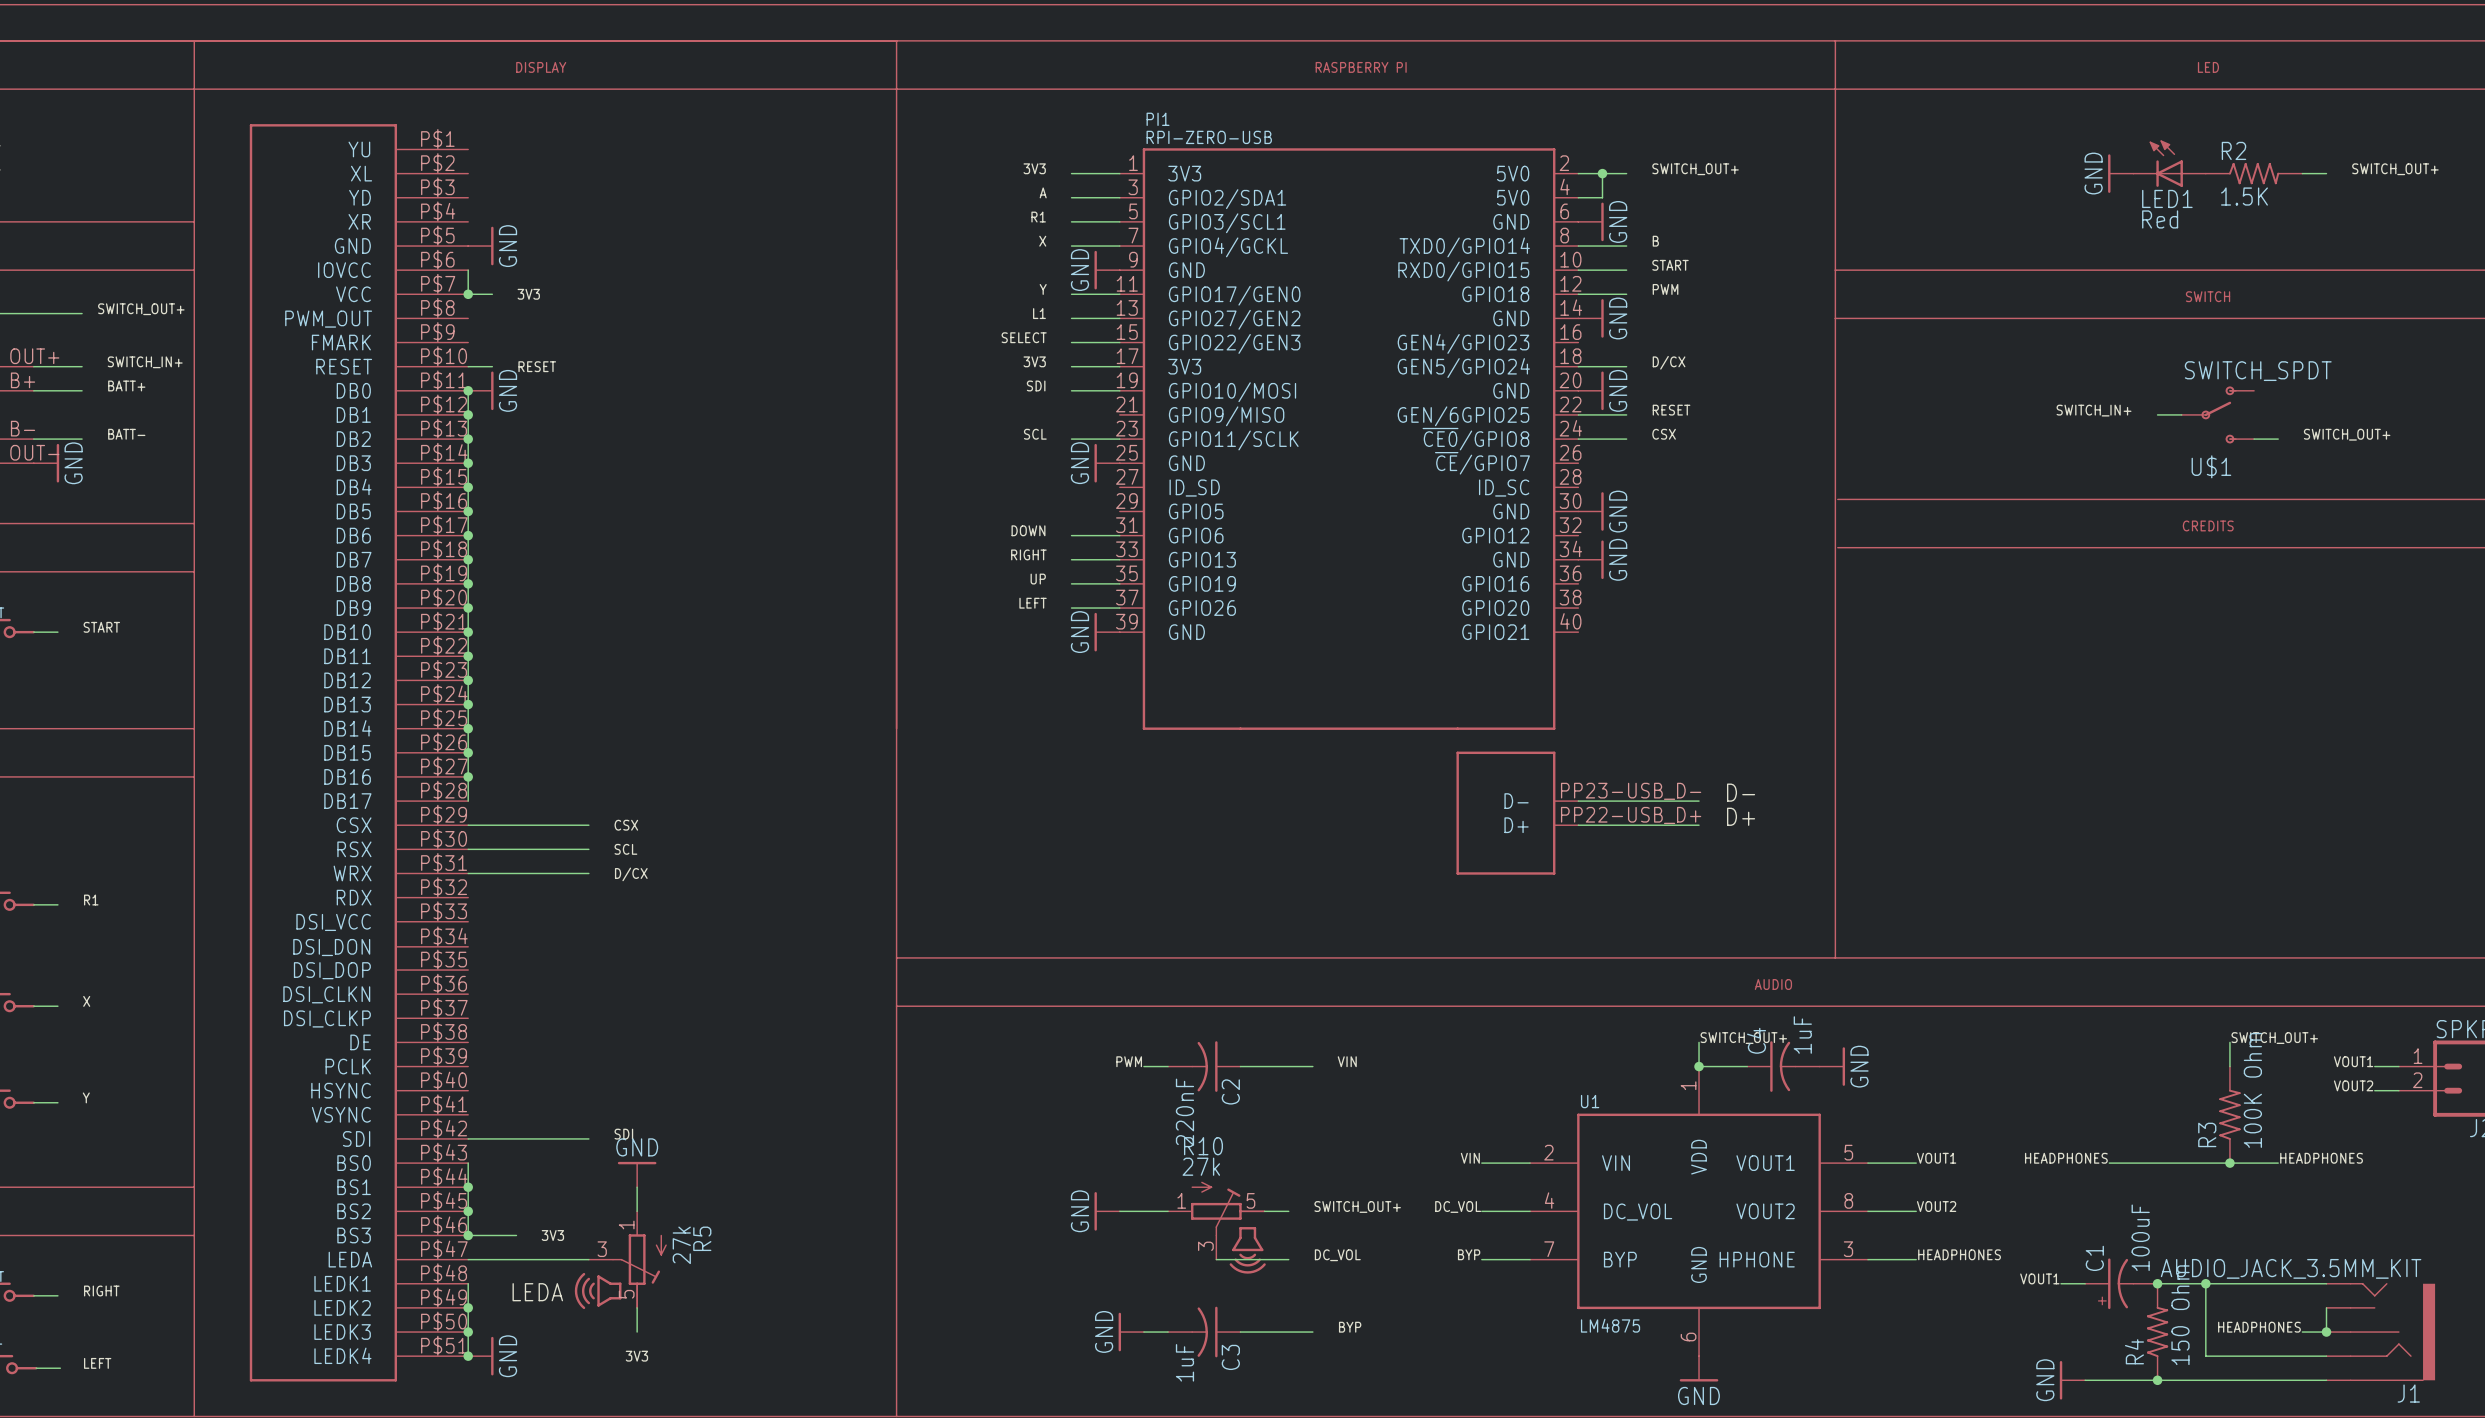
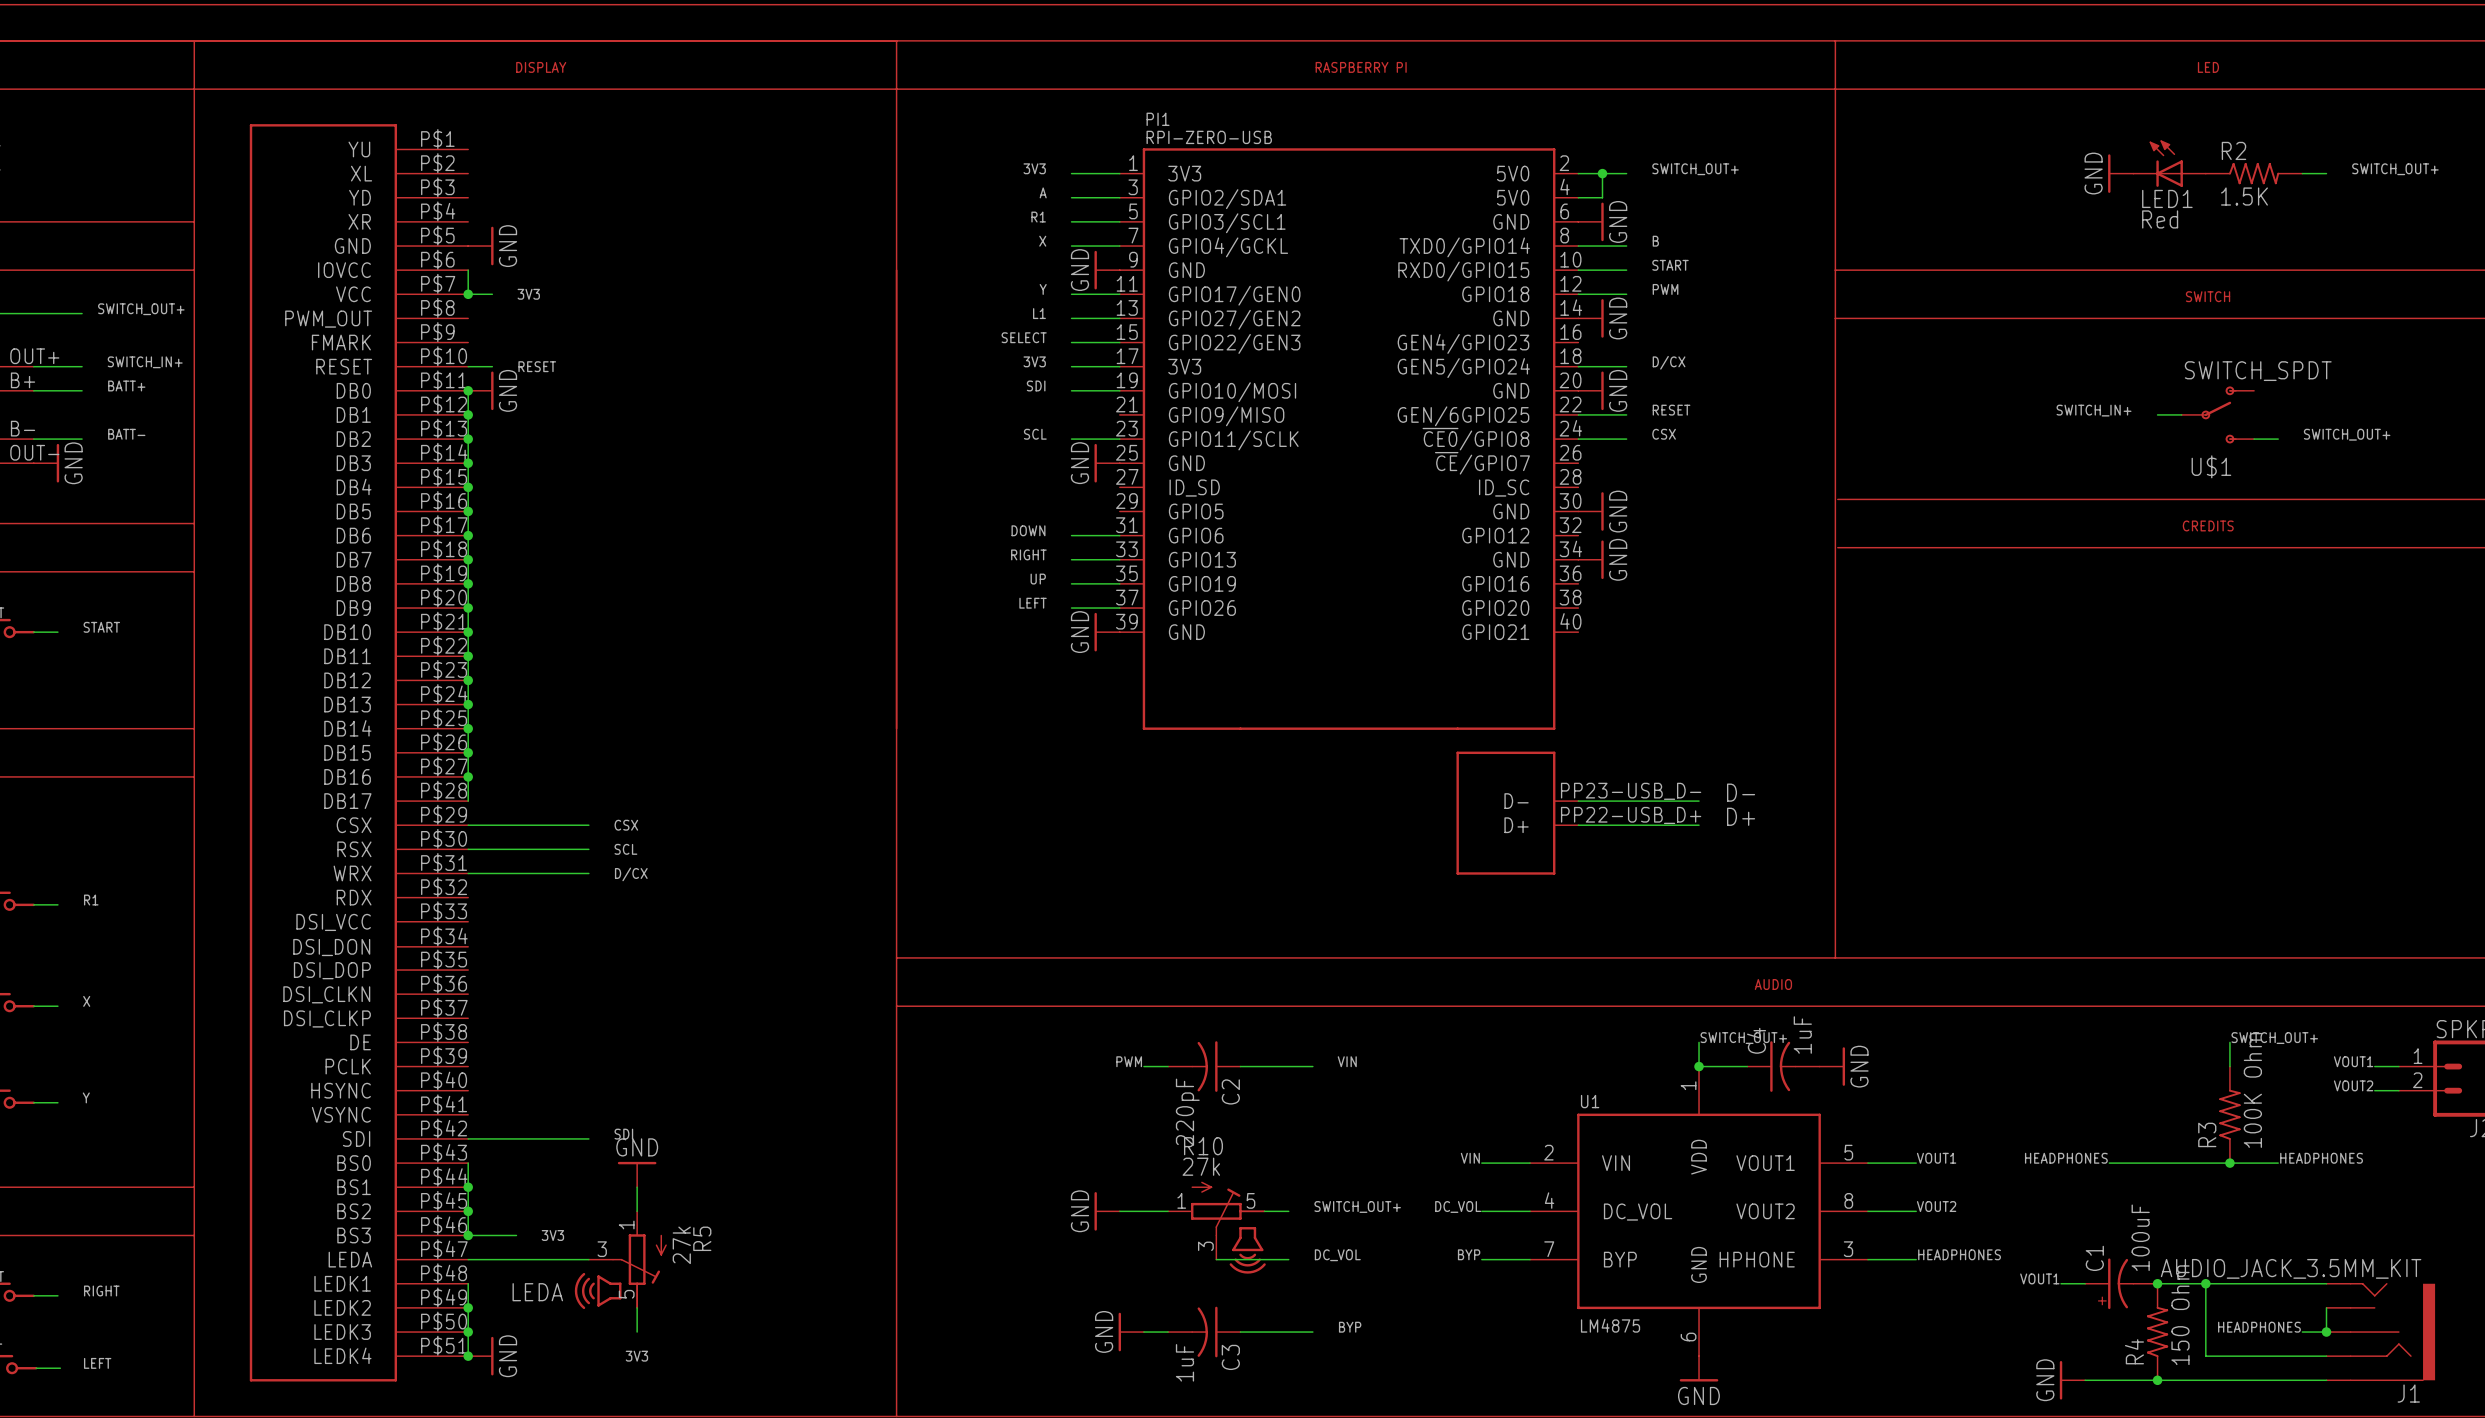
C2 value: 220nF (1184, 1112) -> 220pF (1187, 1112)

